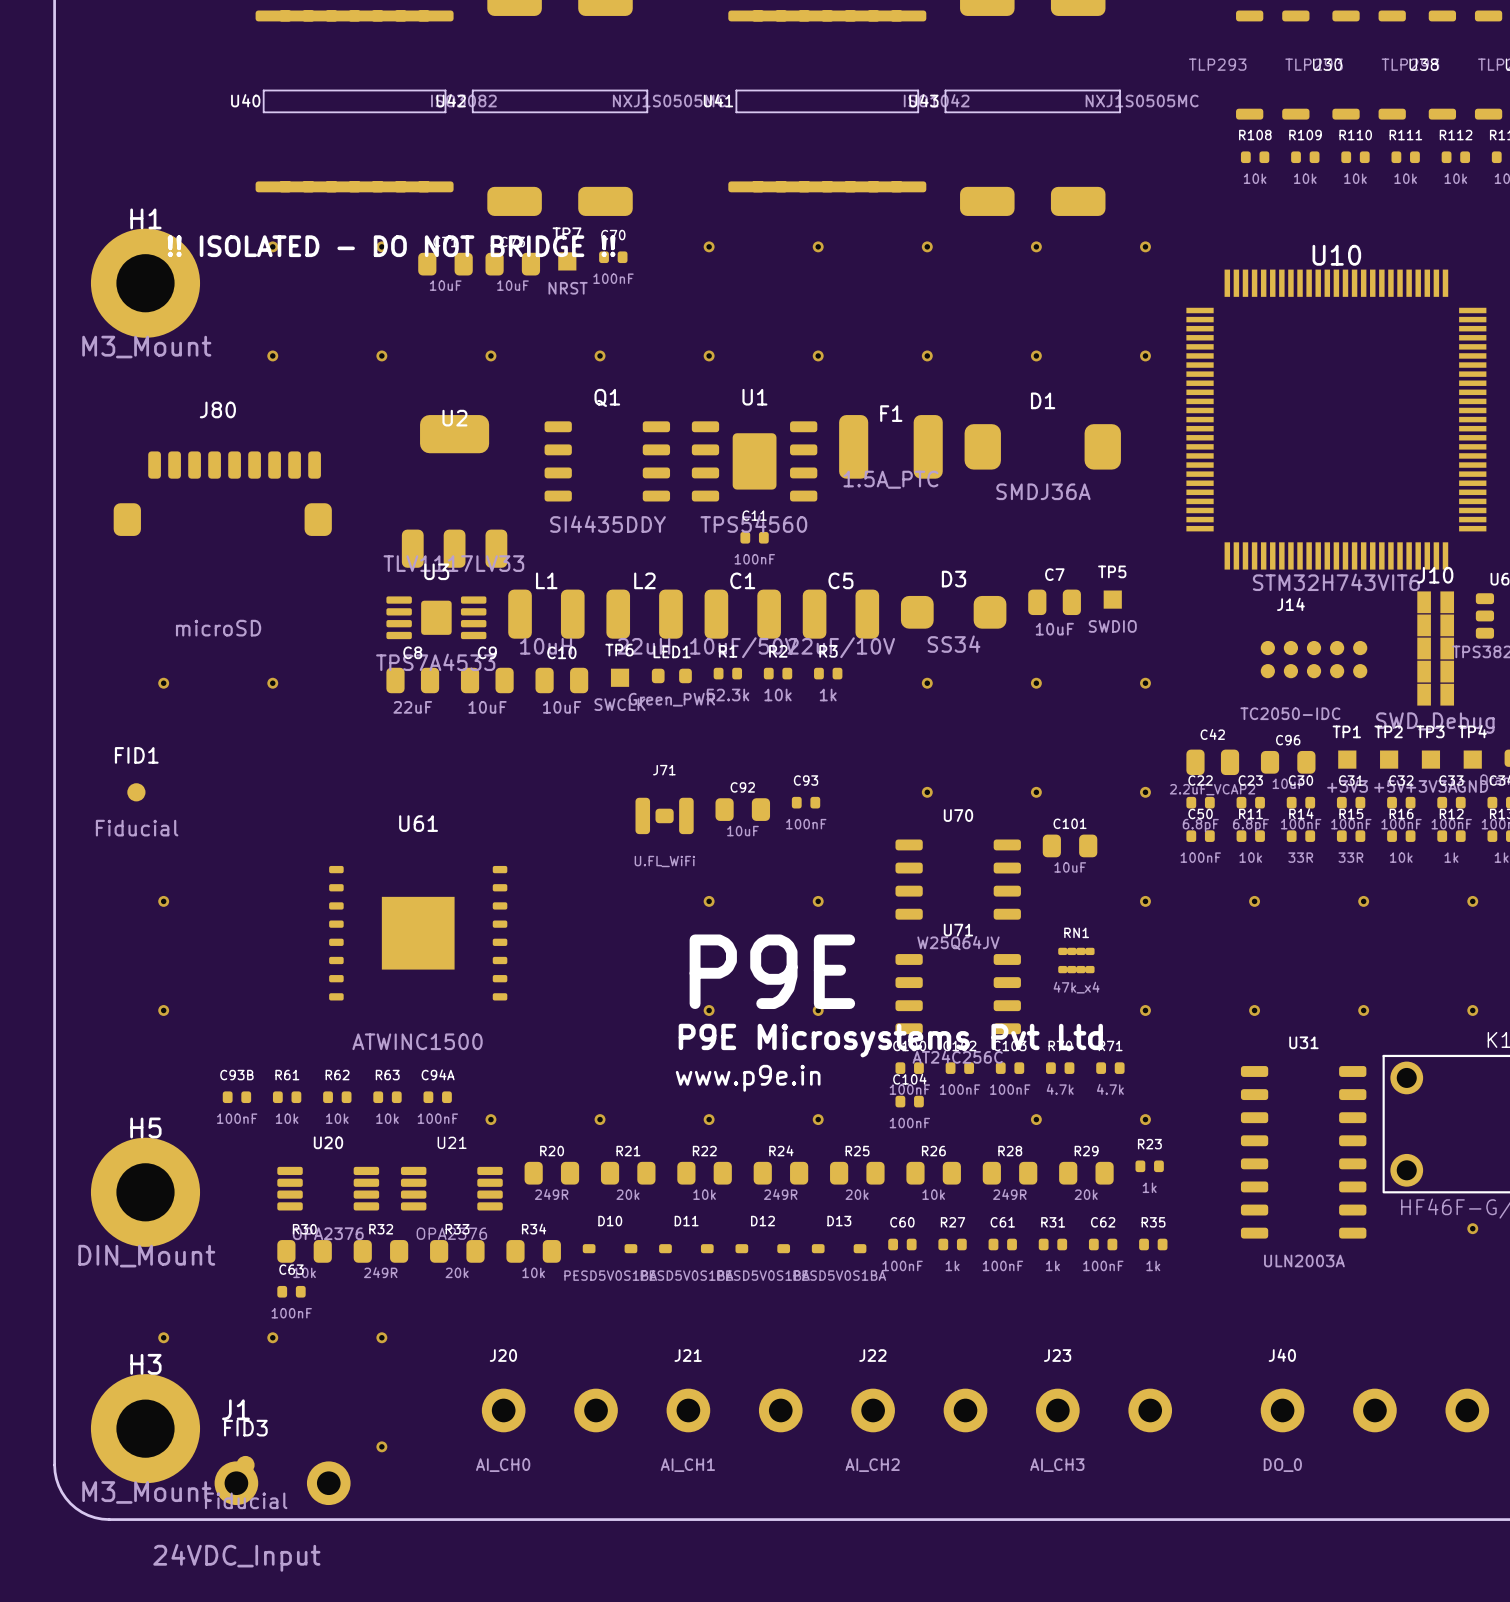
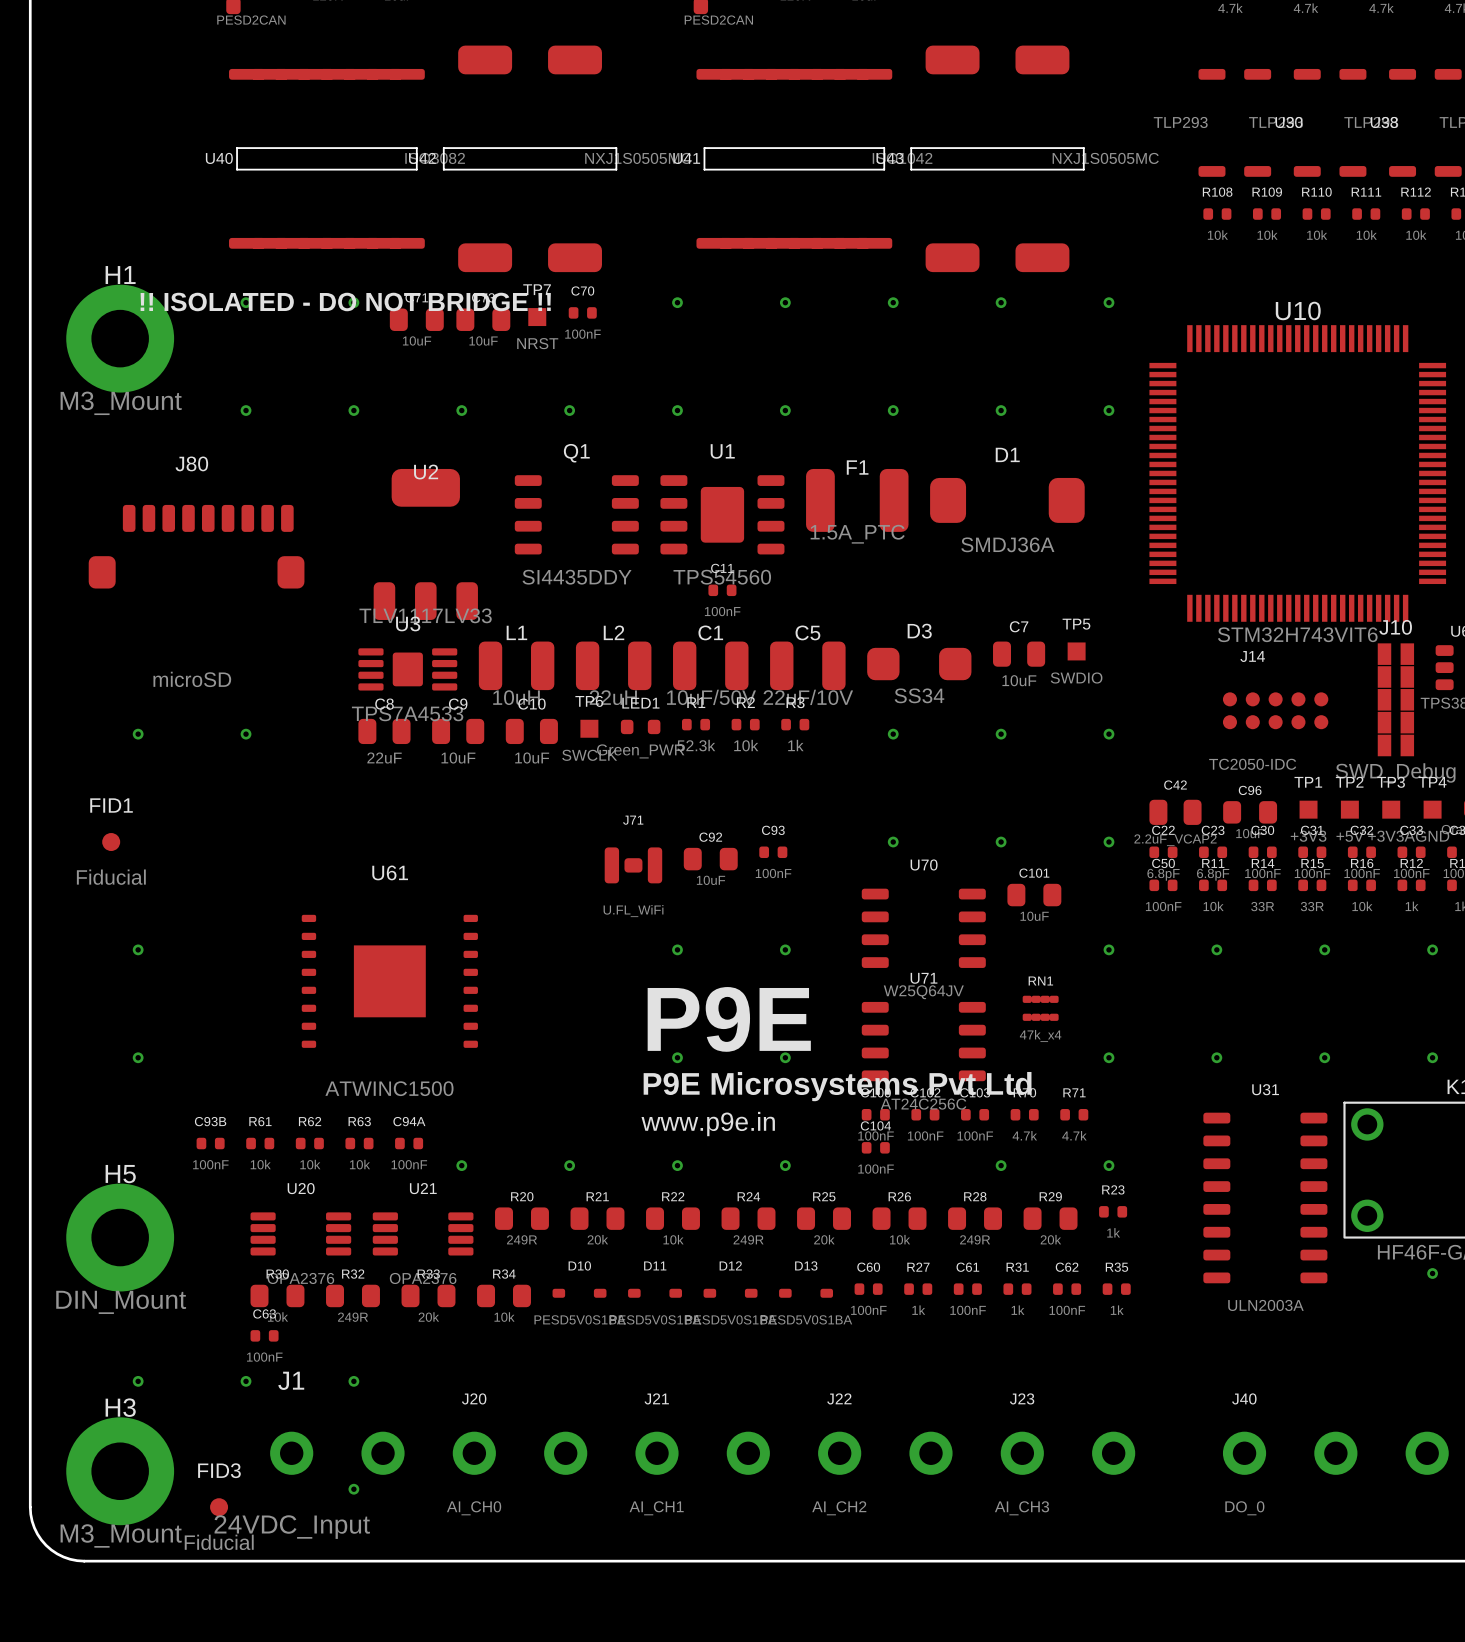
J1 position: (282, 1483) -> (337, 1453)

